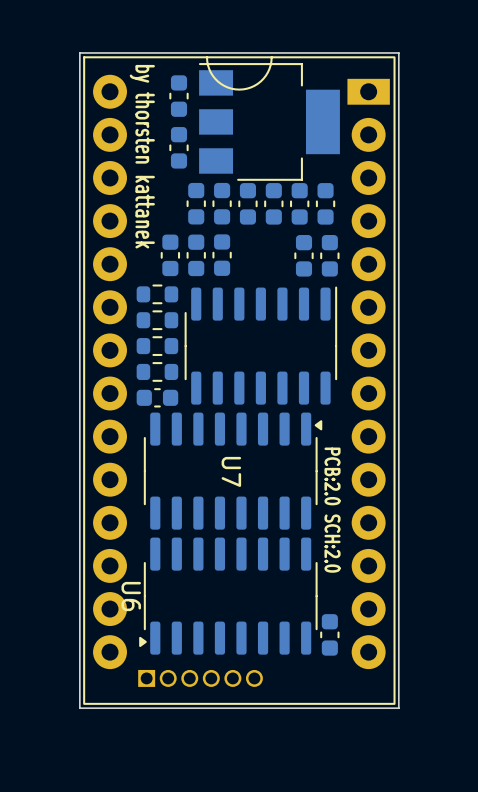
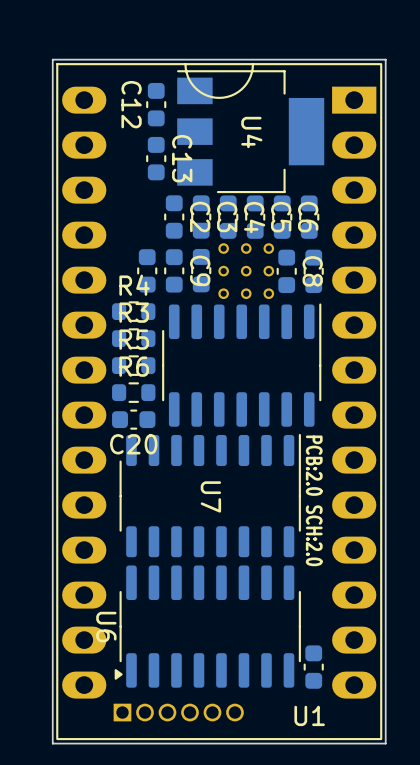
C12 name: none -> C12 (131, 104)
U4 name: none -> U4 (251, 132)
C13 name: none -> C13 (182, 158)
text: by thorsten kattanek (142, 156) -> none
C2 name: none -> C2 (200, 216)
C3 name: none -> C3 (227, 216)
C5 name: none -> C5 (281, 217)
C6 name: none -> C6 (308, 217)
C4 name: none -> C4 (254, 217)
C9 name: none -> C9 (200, 270)
part: none -> (246, 271)
C8 name: none -> C8 (312, 271)
R4 name: none -> R4 (134, 285)
R3 name: none -> R3 (134, 312)
R5 name: none -> R5 (134, 339)
R6 name: none -> R6 (134, 366)
part: (239, 380) -> none
U1: none -> (219, 401)
U7 footprint: [143, 412, 323, 530] -> [119, 433, 301, 558]
C20 name: none -> C20 (133, 444)
text position: PCB:2.0 SCH:2.0 (332, 510) -> PCB:2.0 SCH:2.0 (314, 500)

